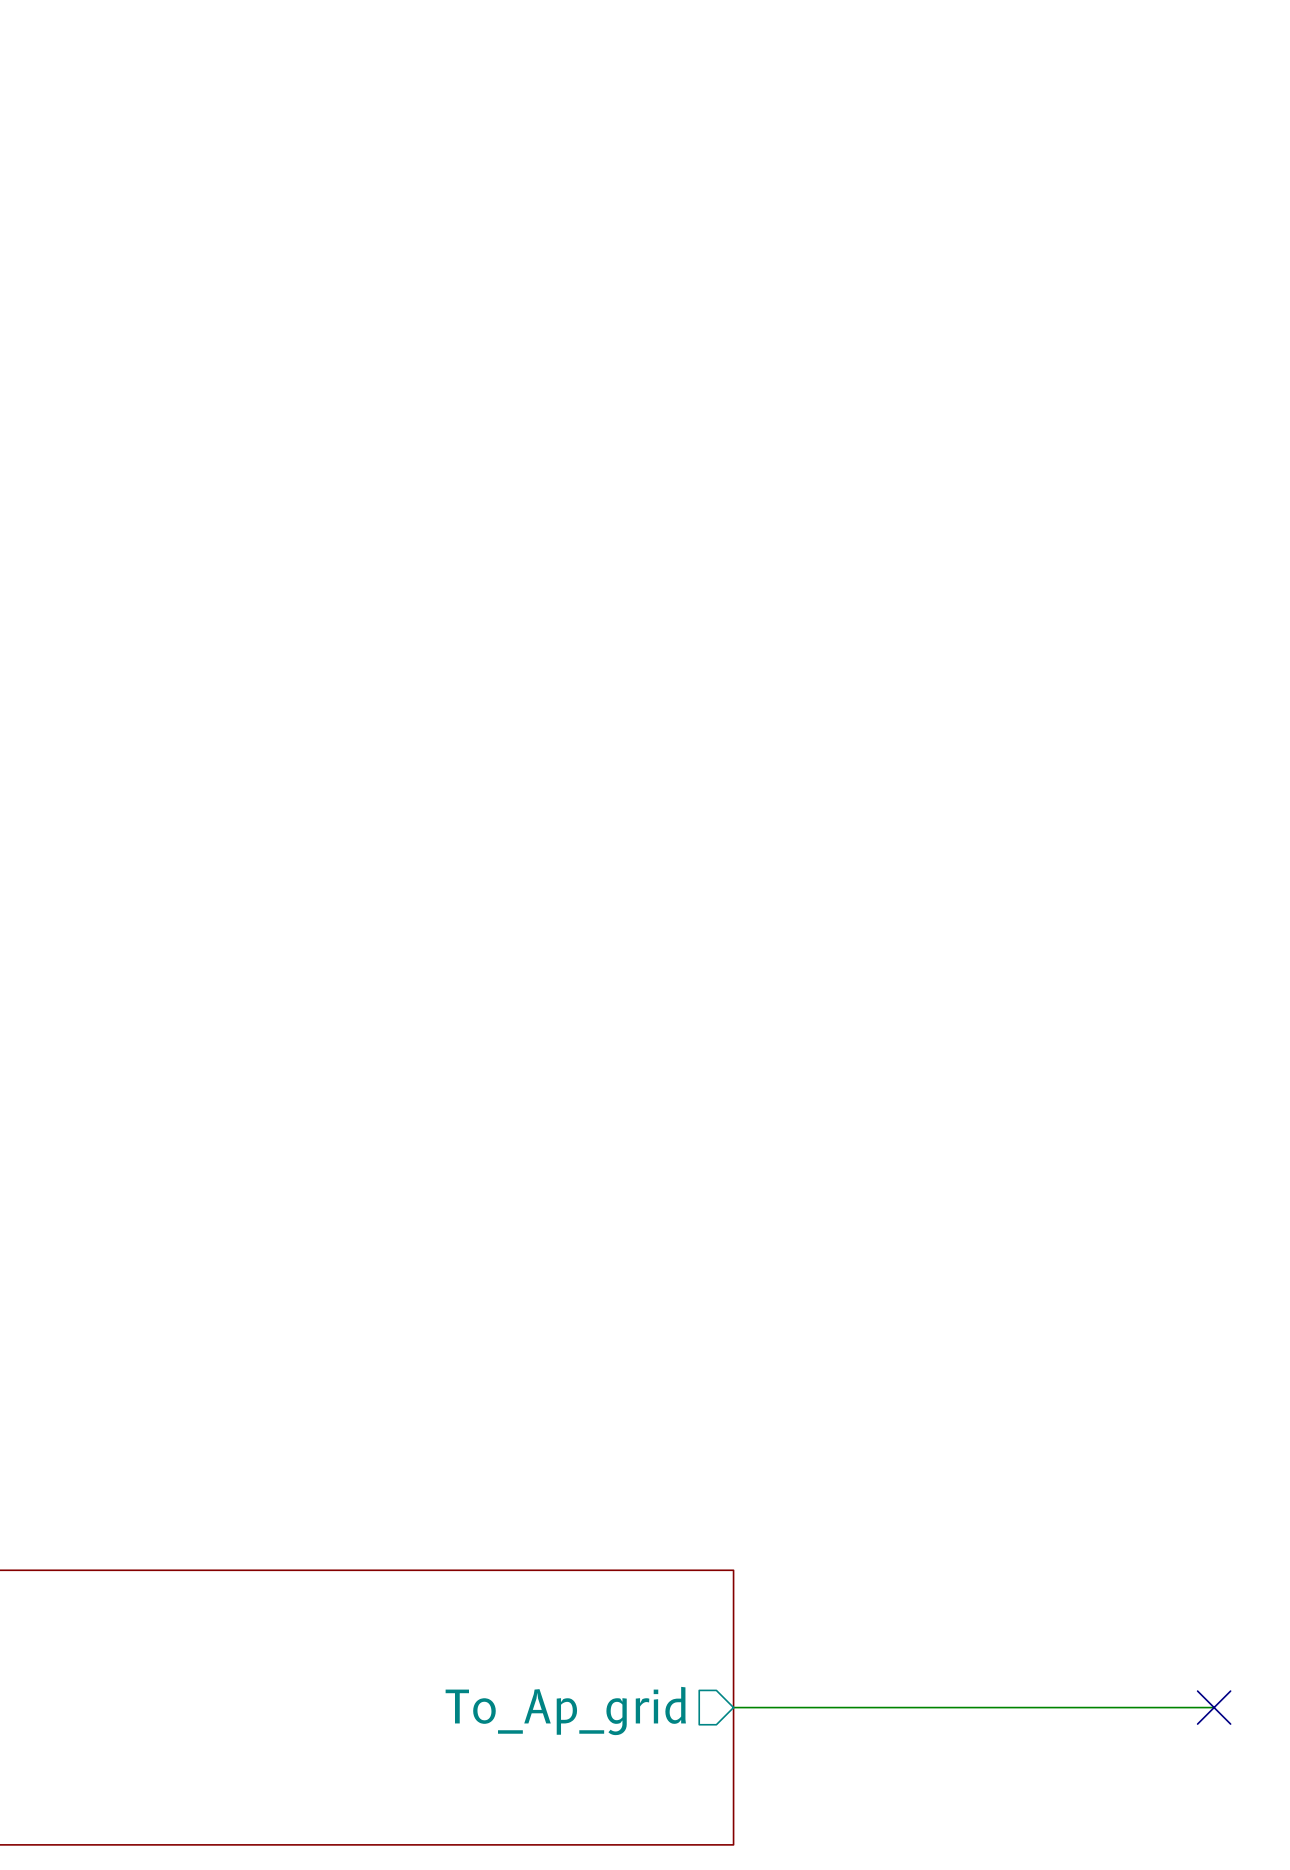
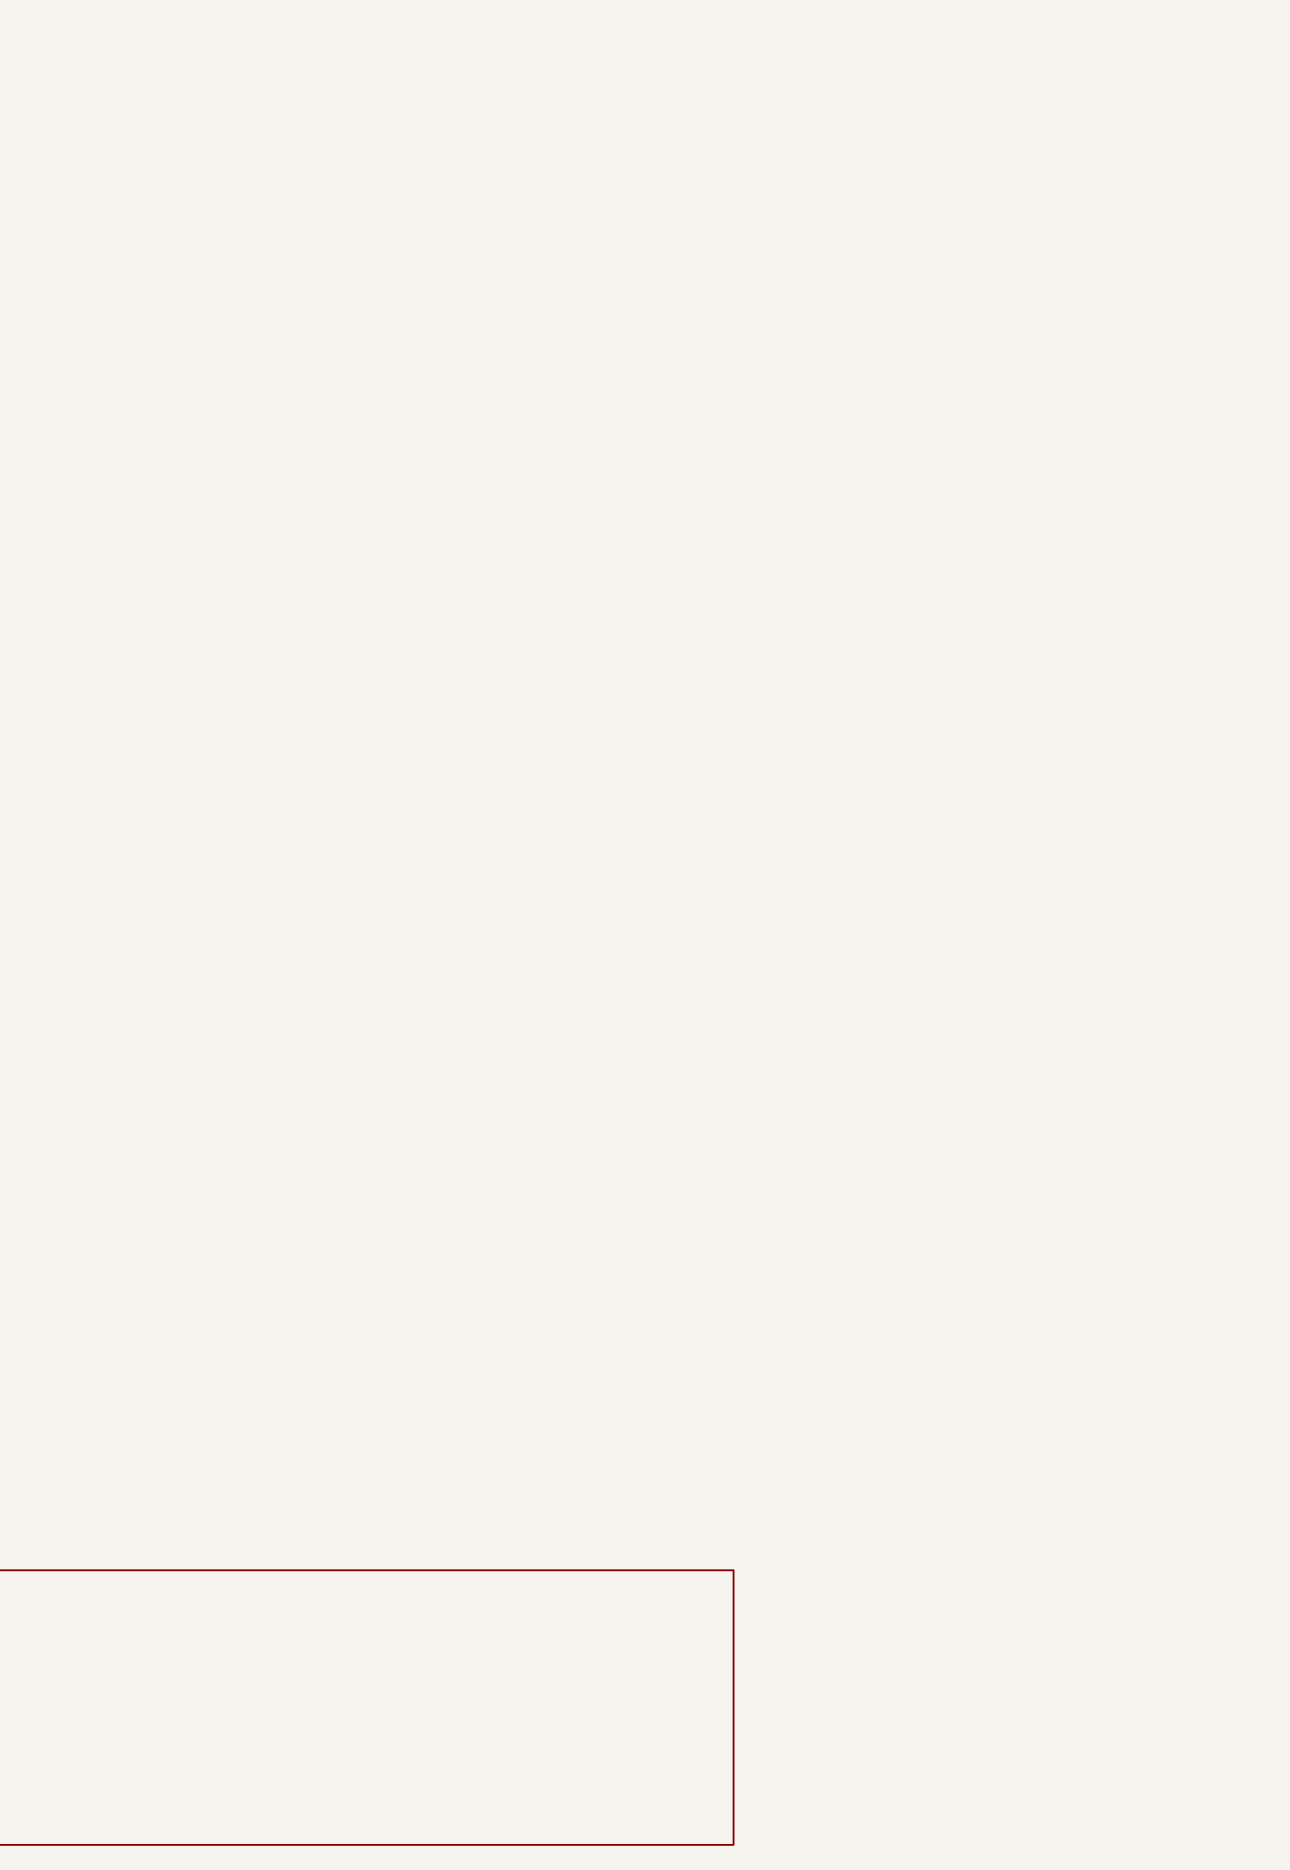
wire: (733, 1707) (1214, 1707) -> none
no-connect mark: (1214, 1707) -> none
sheet pin: To_Ap_grid (565, 1711) -> none

